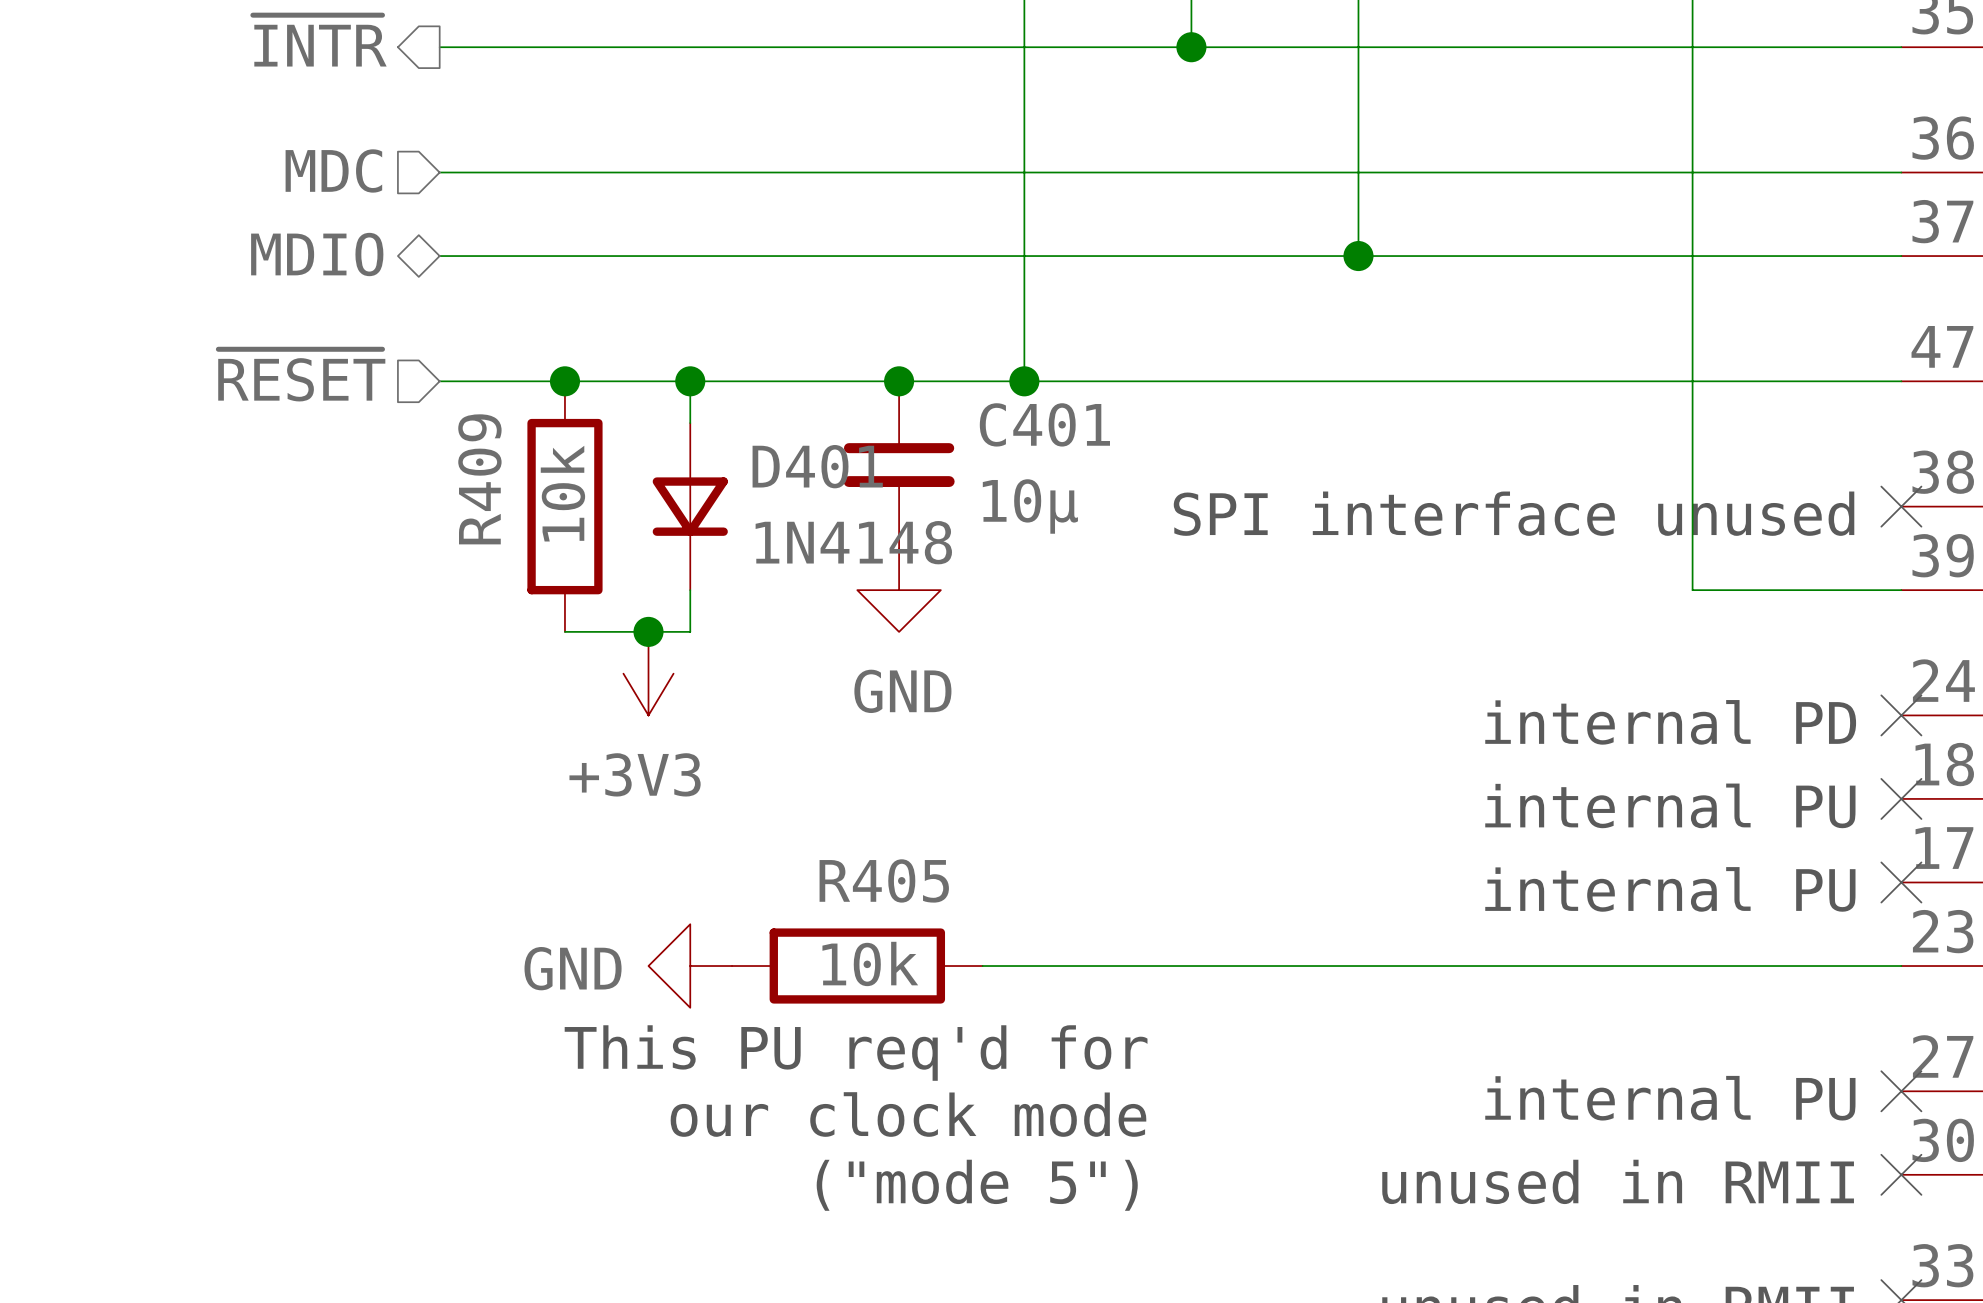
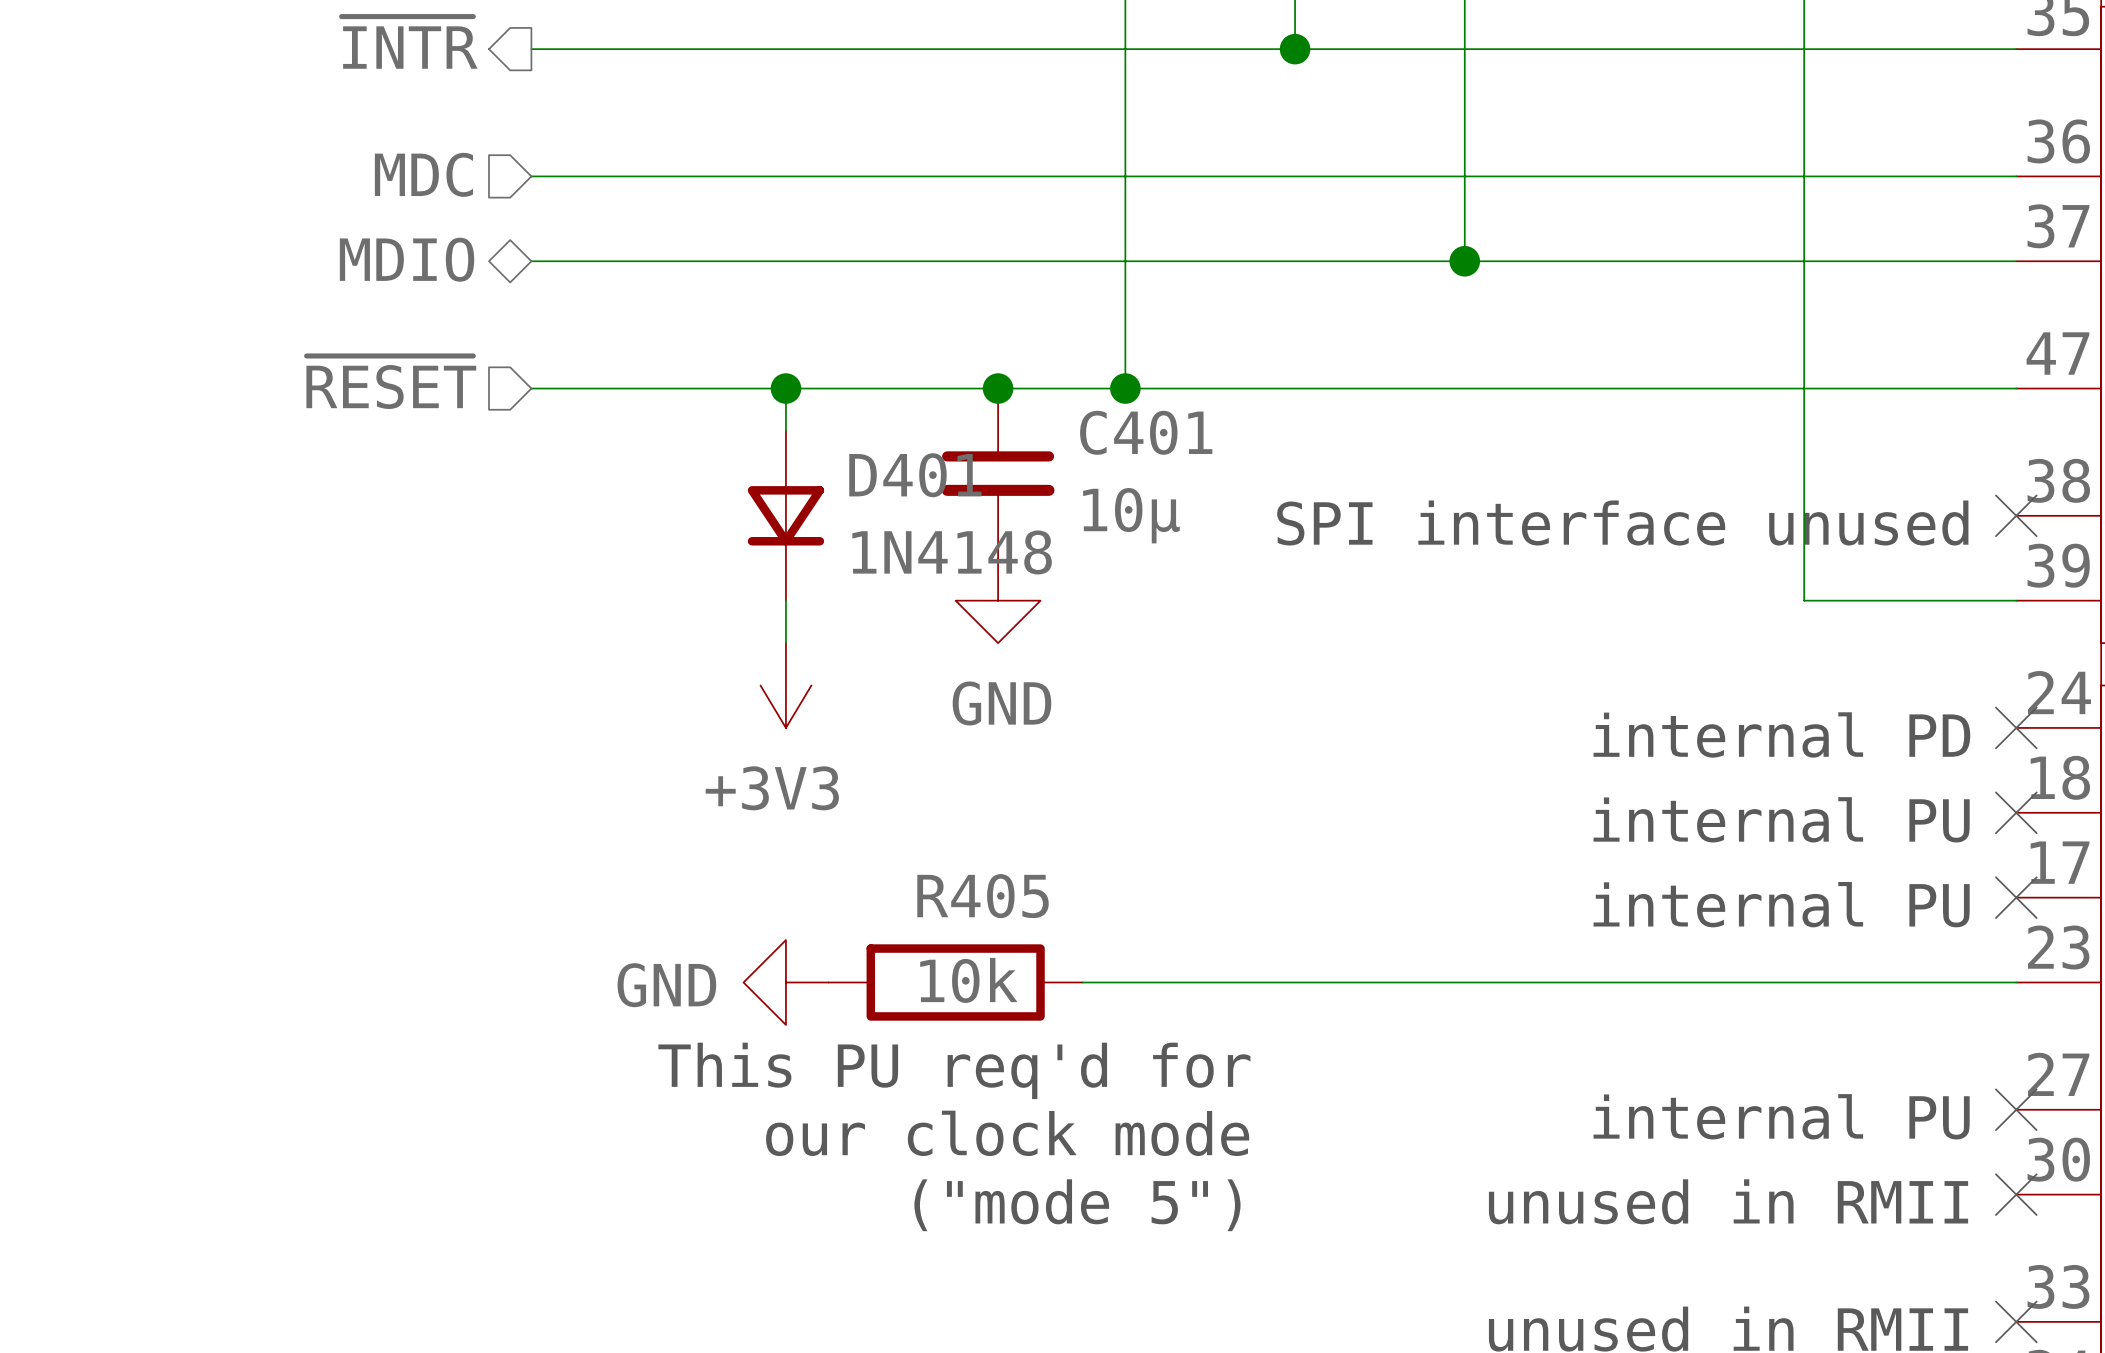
junction: (564, 381) -> none
R409: 10k (564, 506) -> none
wire: (564, 631) (690, 631) -> none
junction: (648, 631) -> none
power symbol position: +3V3 (648, 673) -> +3V3 (785, 685)

